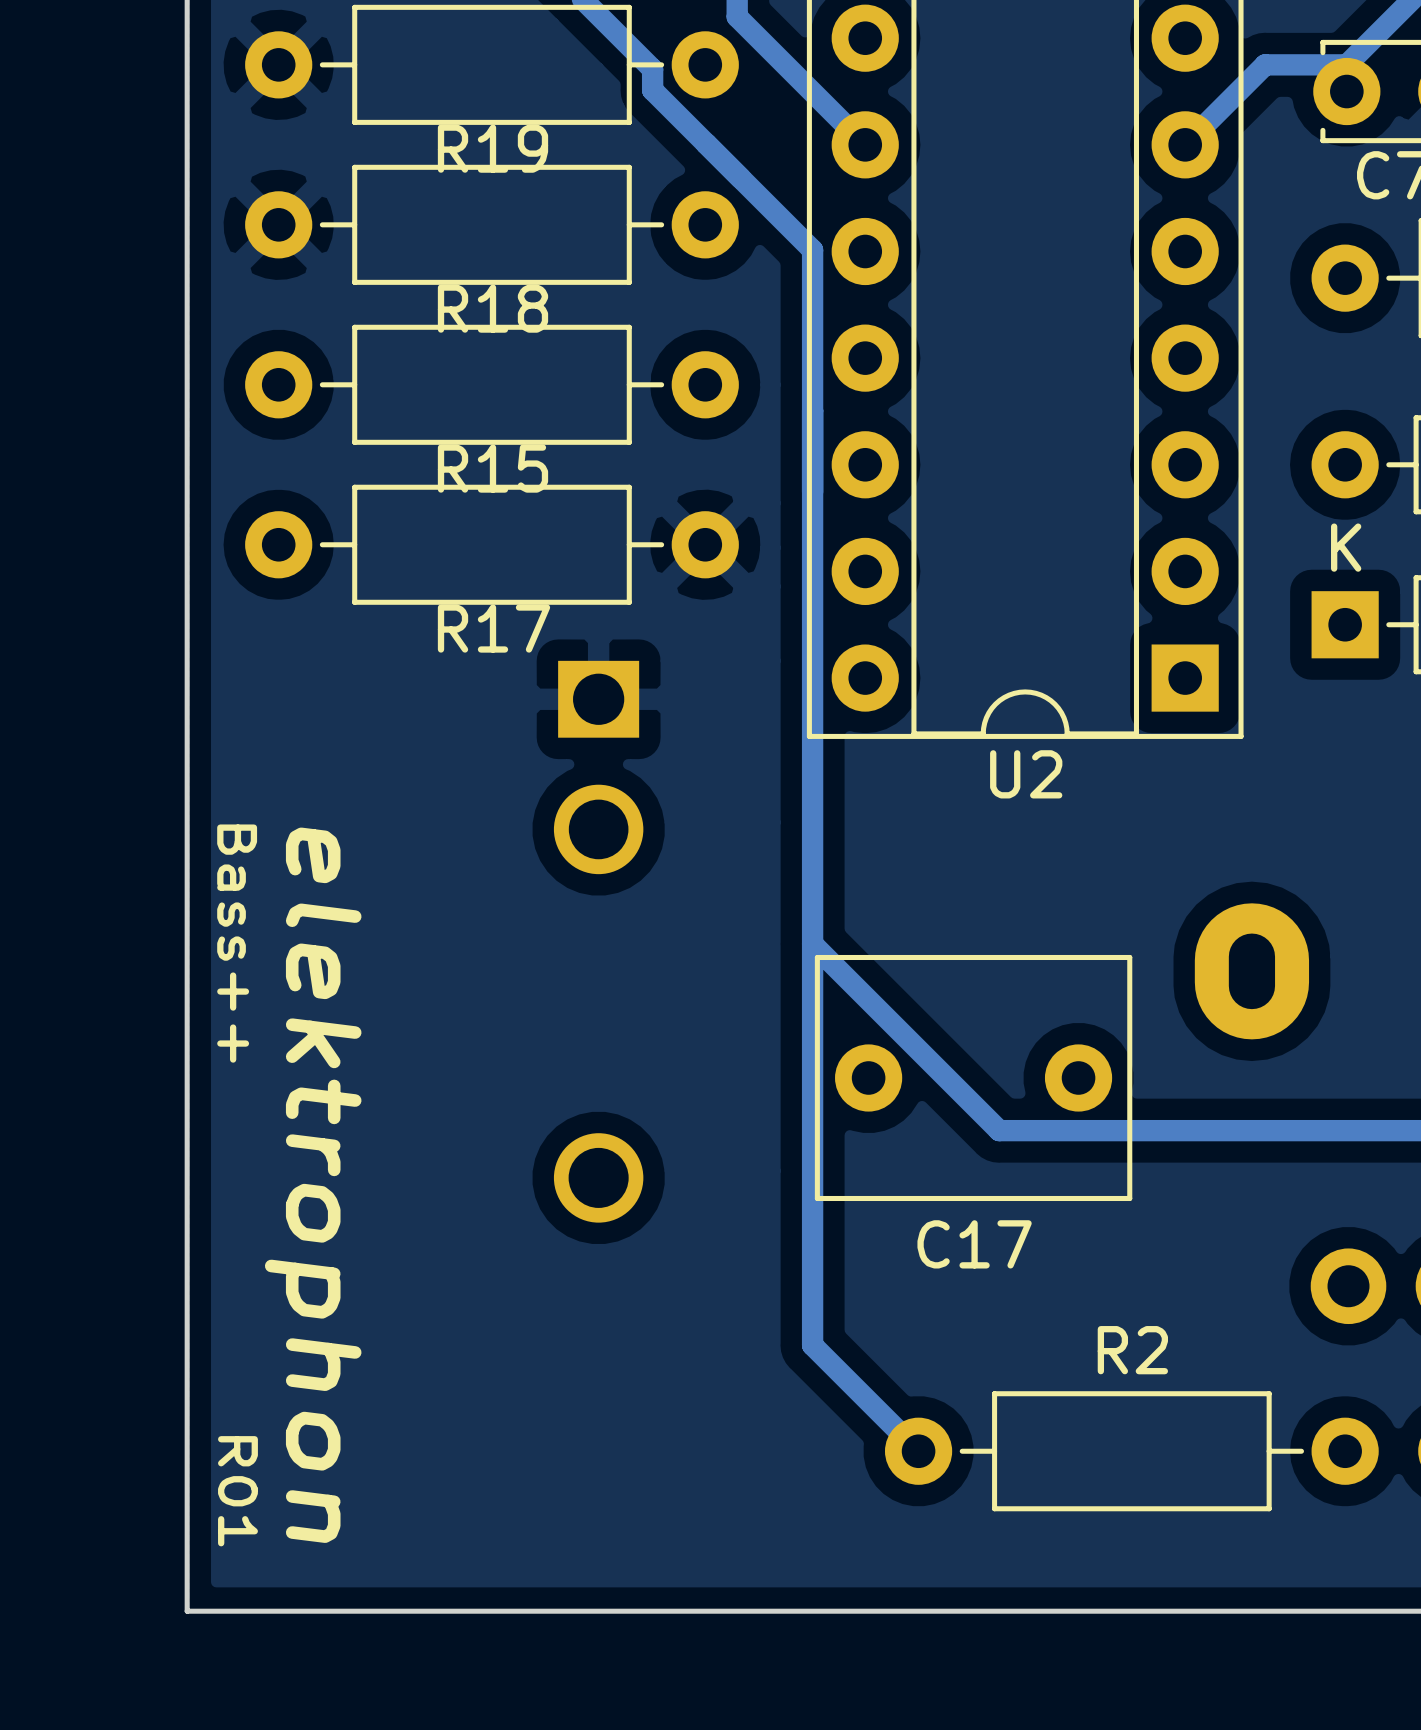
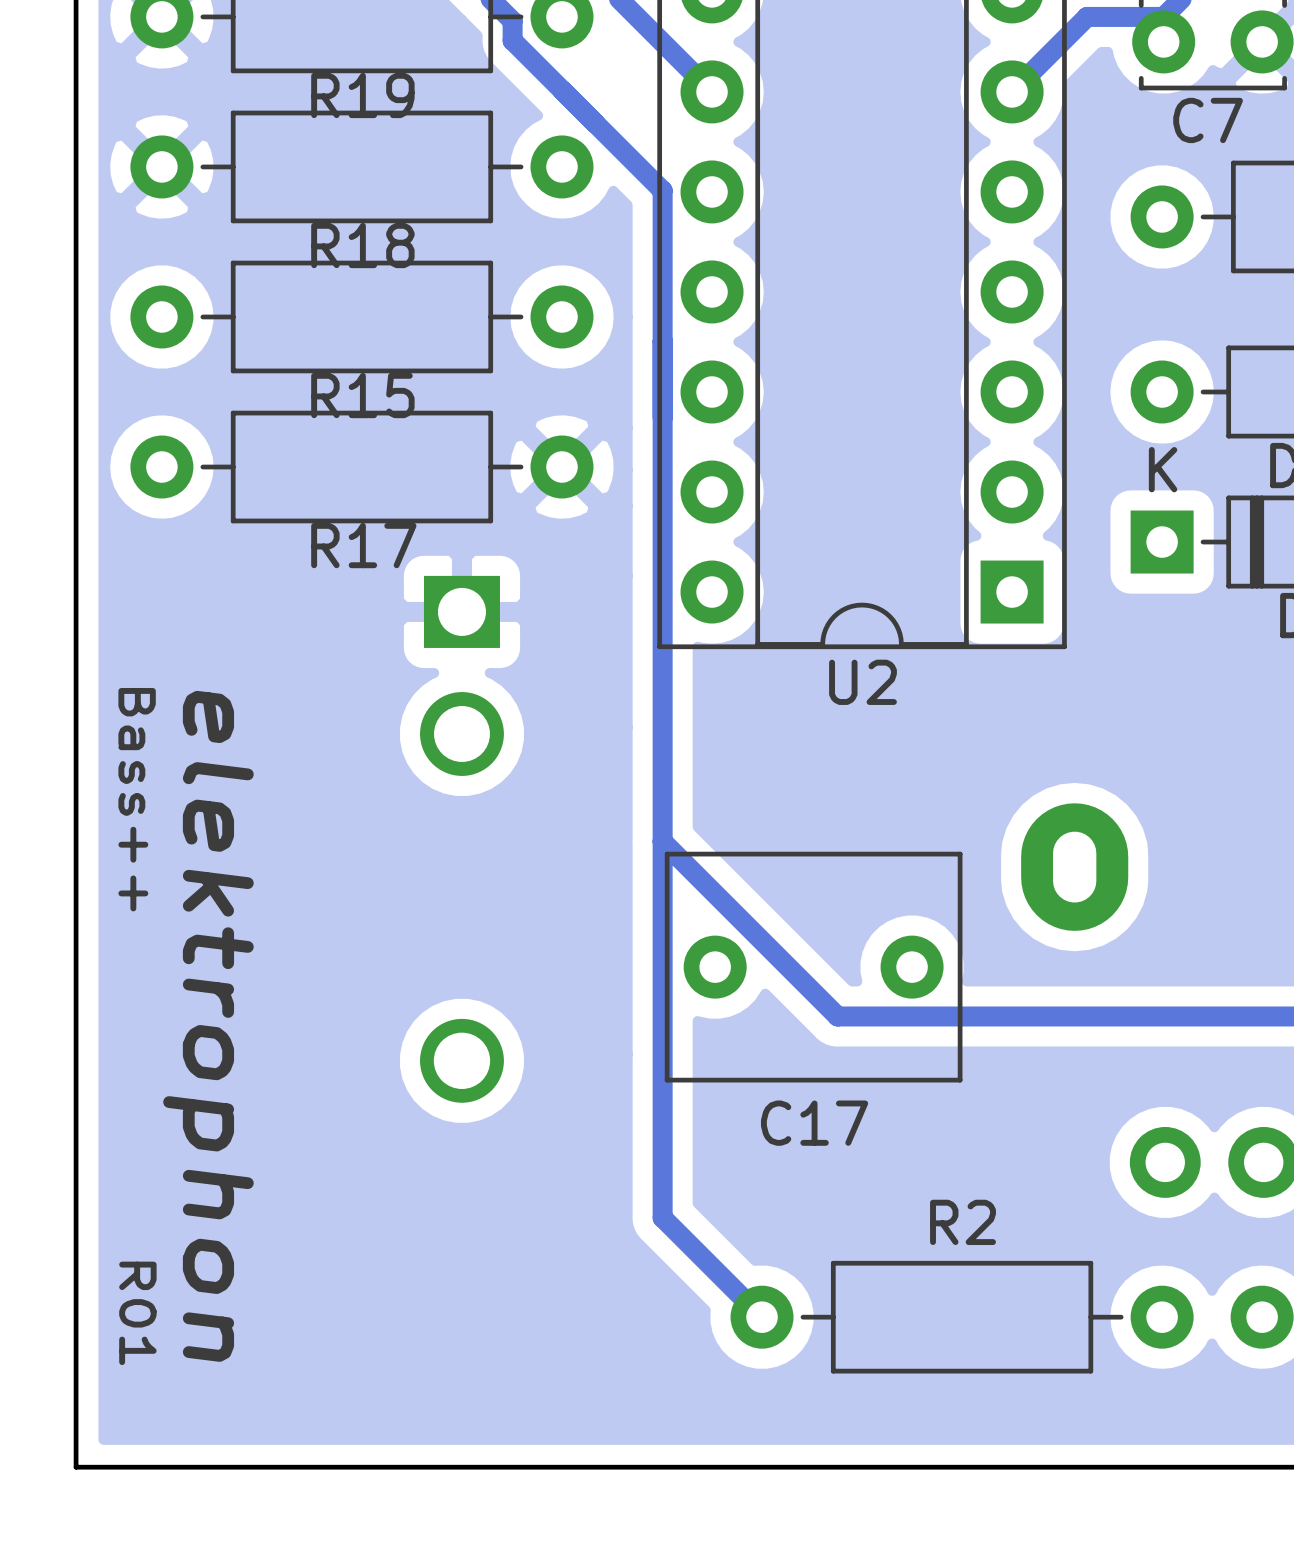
drawing position: (289, 1185) -> (186, 1026)

